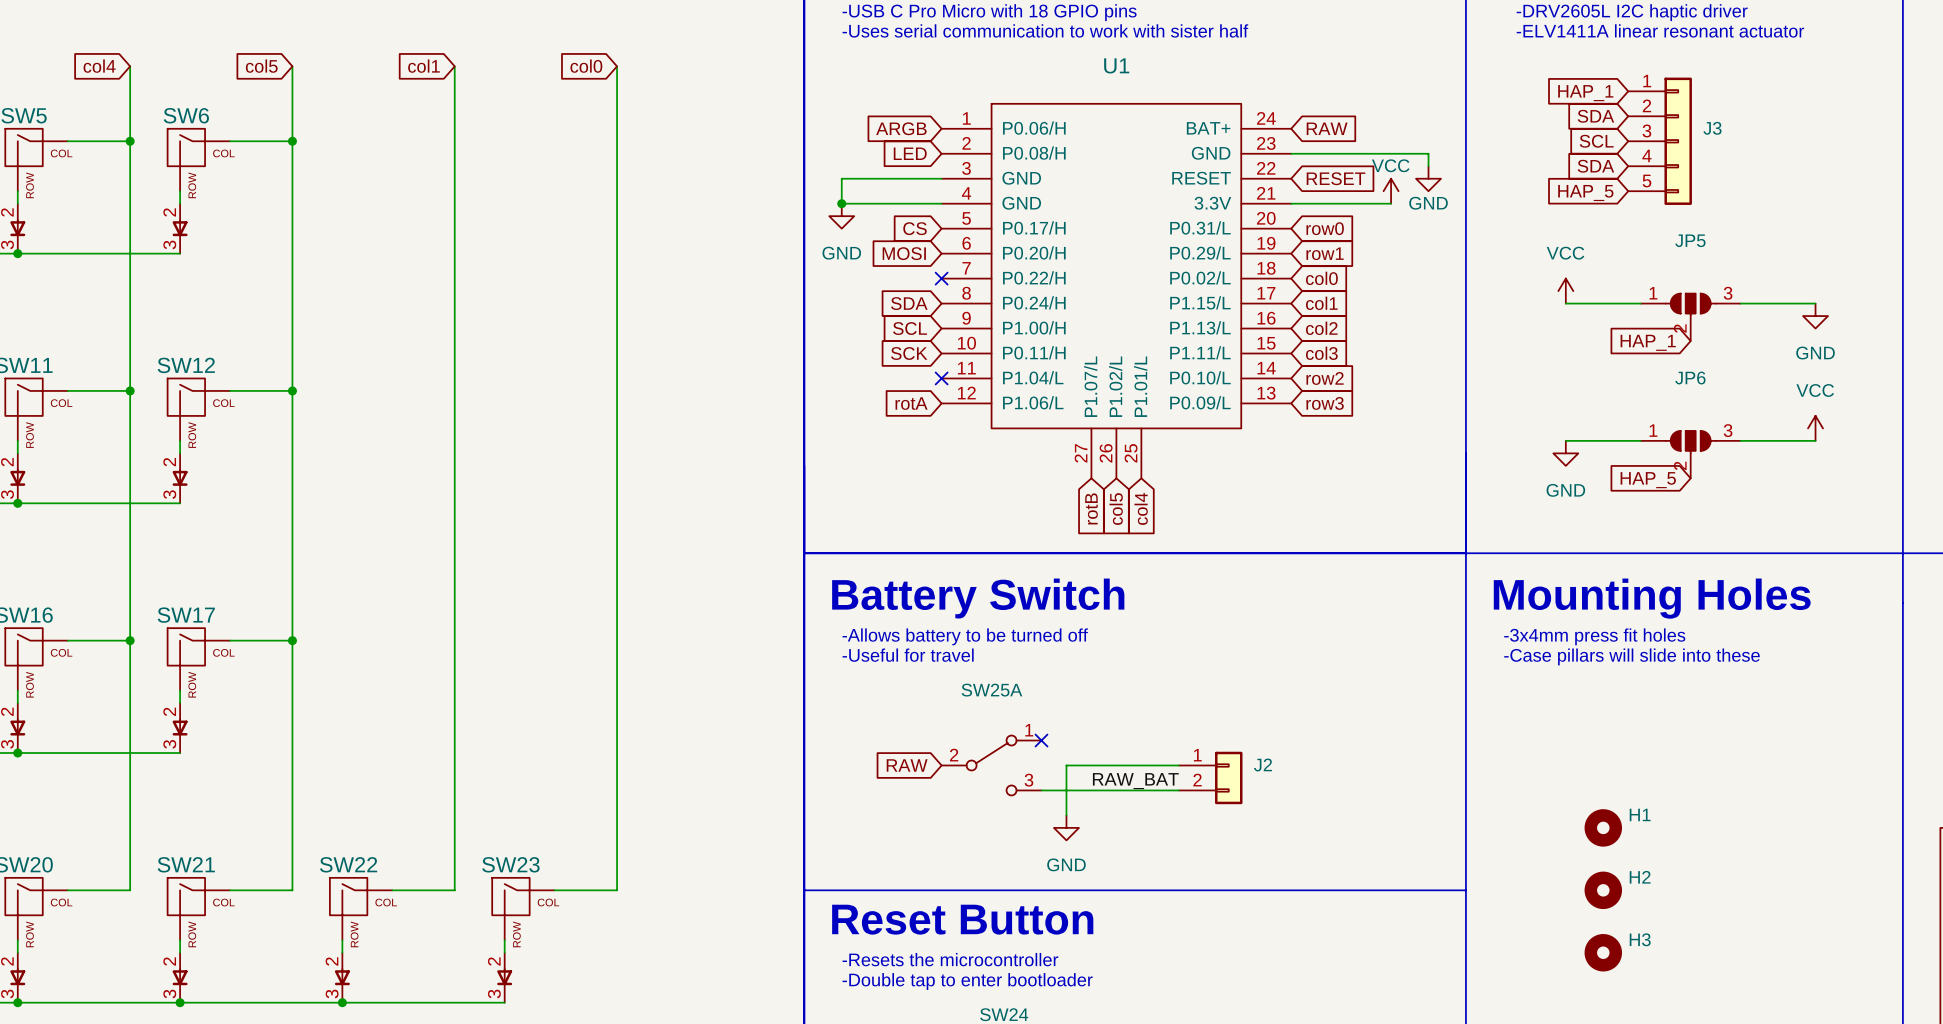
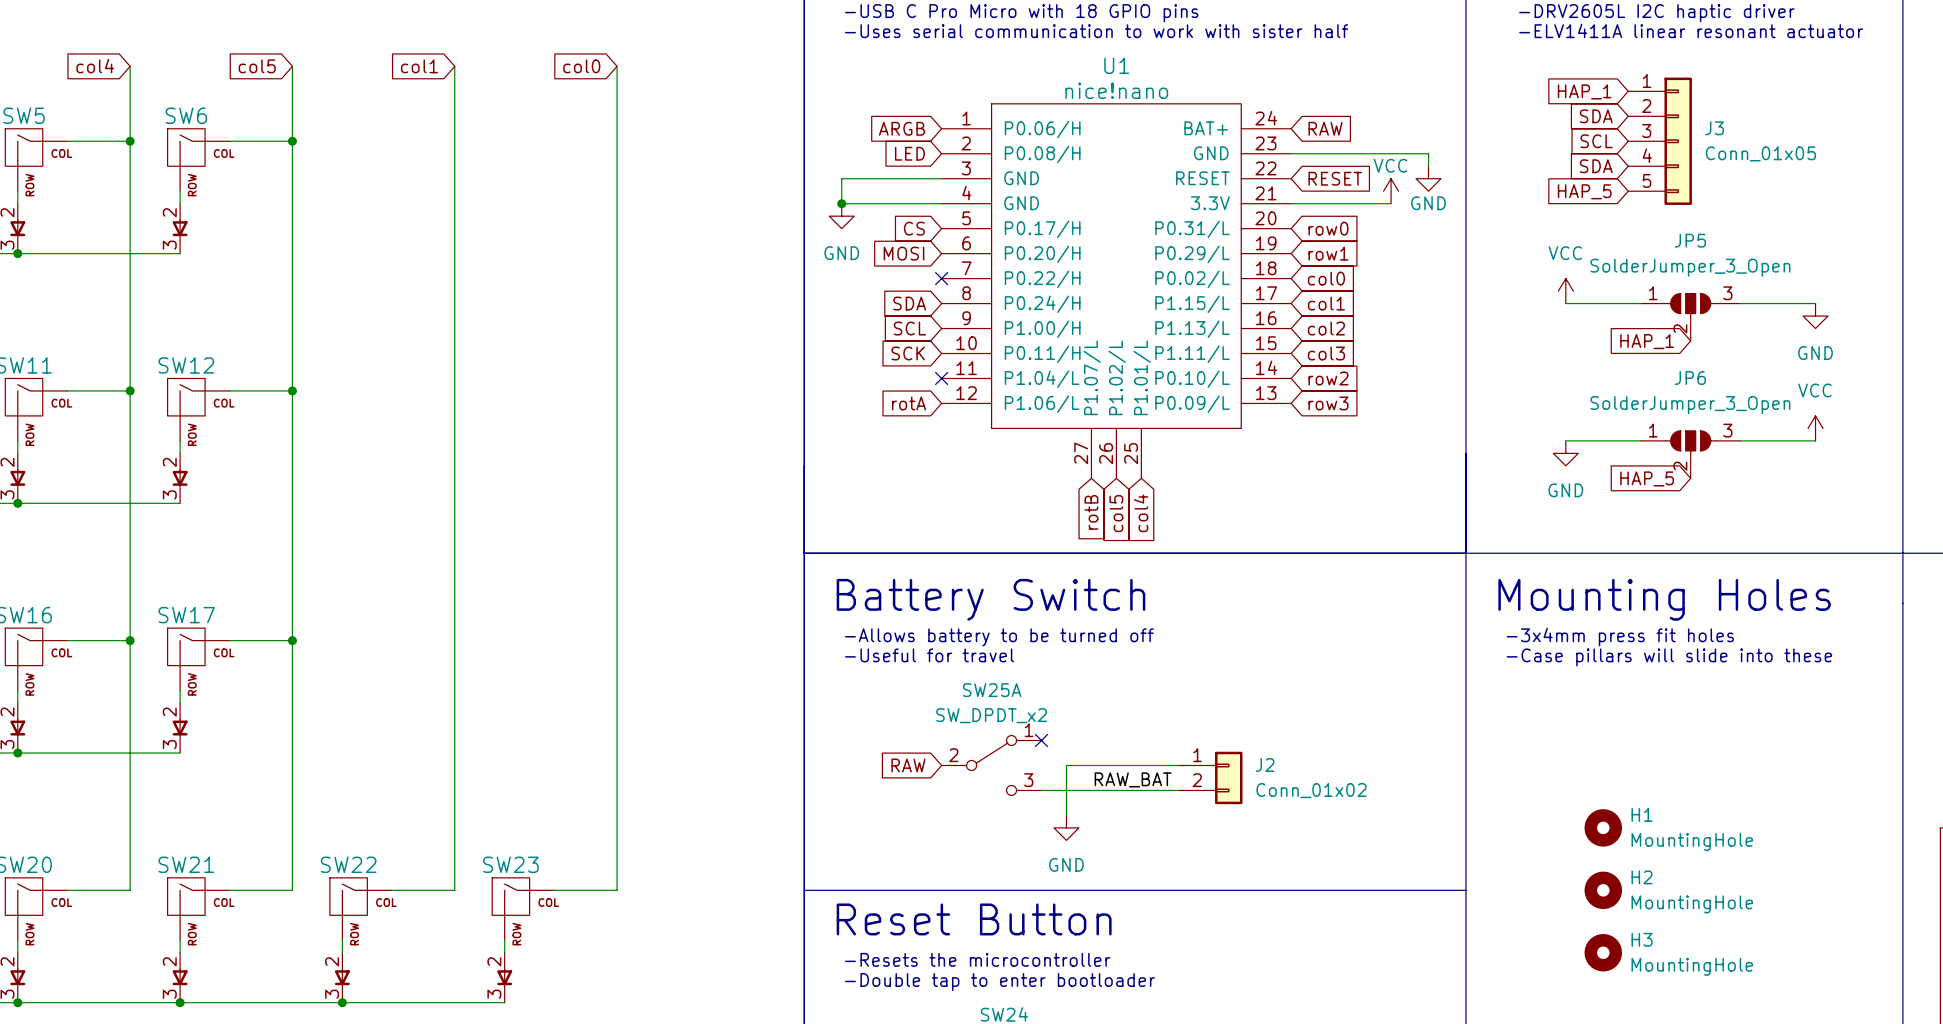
U1 value: none -> nice!nano (1116, 90)
J3 value: none -> Conn_01x05 (1760, 153)
JP5 value: none -> SolderJumper_3_Open (1690, 267)
JP6 value: none -> SolderJumper_3_Open (1690, 405)
SW25A value: none -> SW_DPDT_x2 (991, 715)
J2 value: none -> Conn_01x02 (1311, 790)
H1 value: none -> MountingHole (1692, 842)
H2 value: none -> MountingHole (1692, 904)
H3 value: none -> MountingHole (1692, 966)

